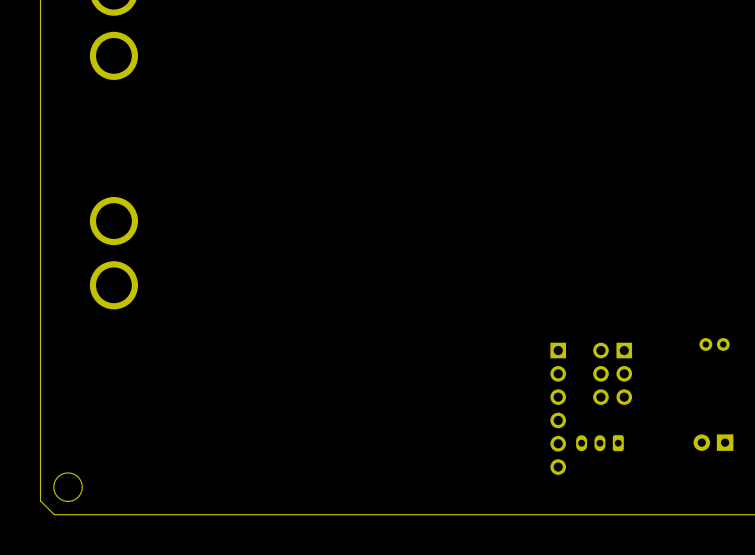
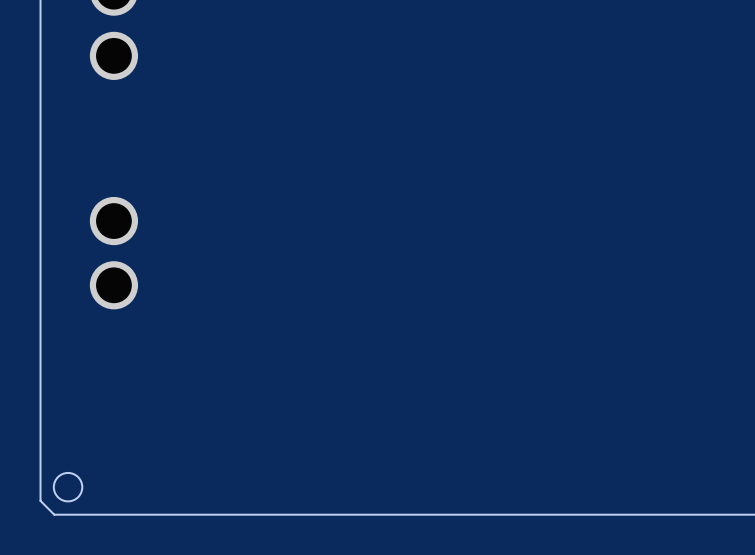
part: (714, 344) -> none
part: (612, 373) -> none
part: (558, 408) -> none
part: (713, 442) -> none
part: (599, 443) -> none

